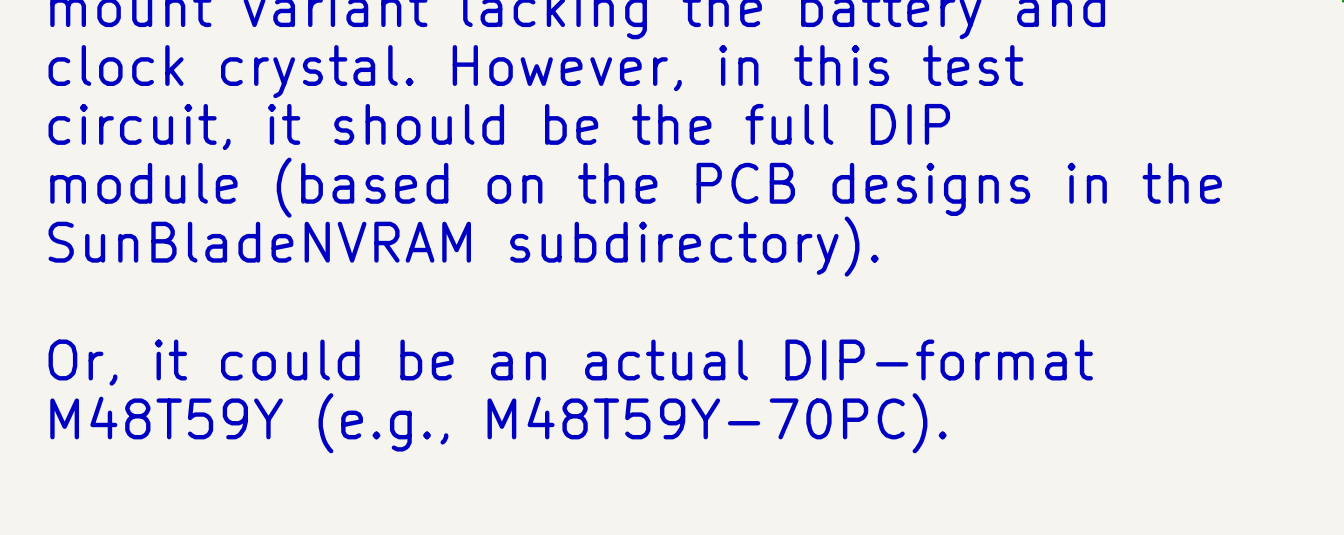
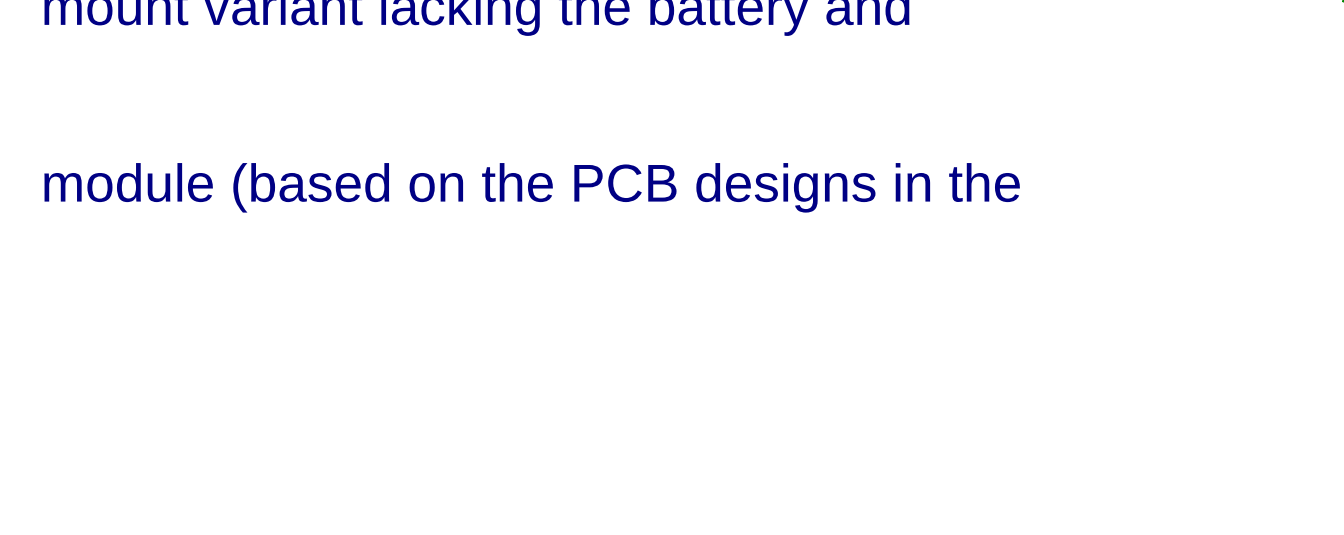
text: clock crystal. However, in this test (535, 71) -> none
text: circuit, it should be the full DIP (499, 127) -> none
text: SunBladeNVRAM subdirectory). (463, 246) -> none
text: Or, it could be an actual DIP-format (570, 362) -> none
text: M48T59Y (e.g., M48T59Y-70PC). (498, 423) -> none

